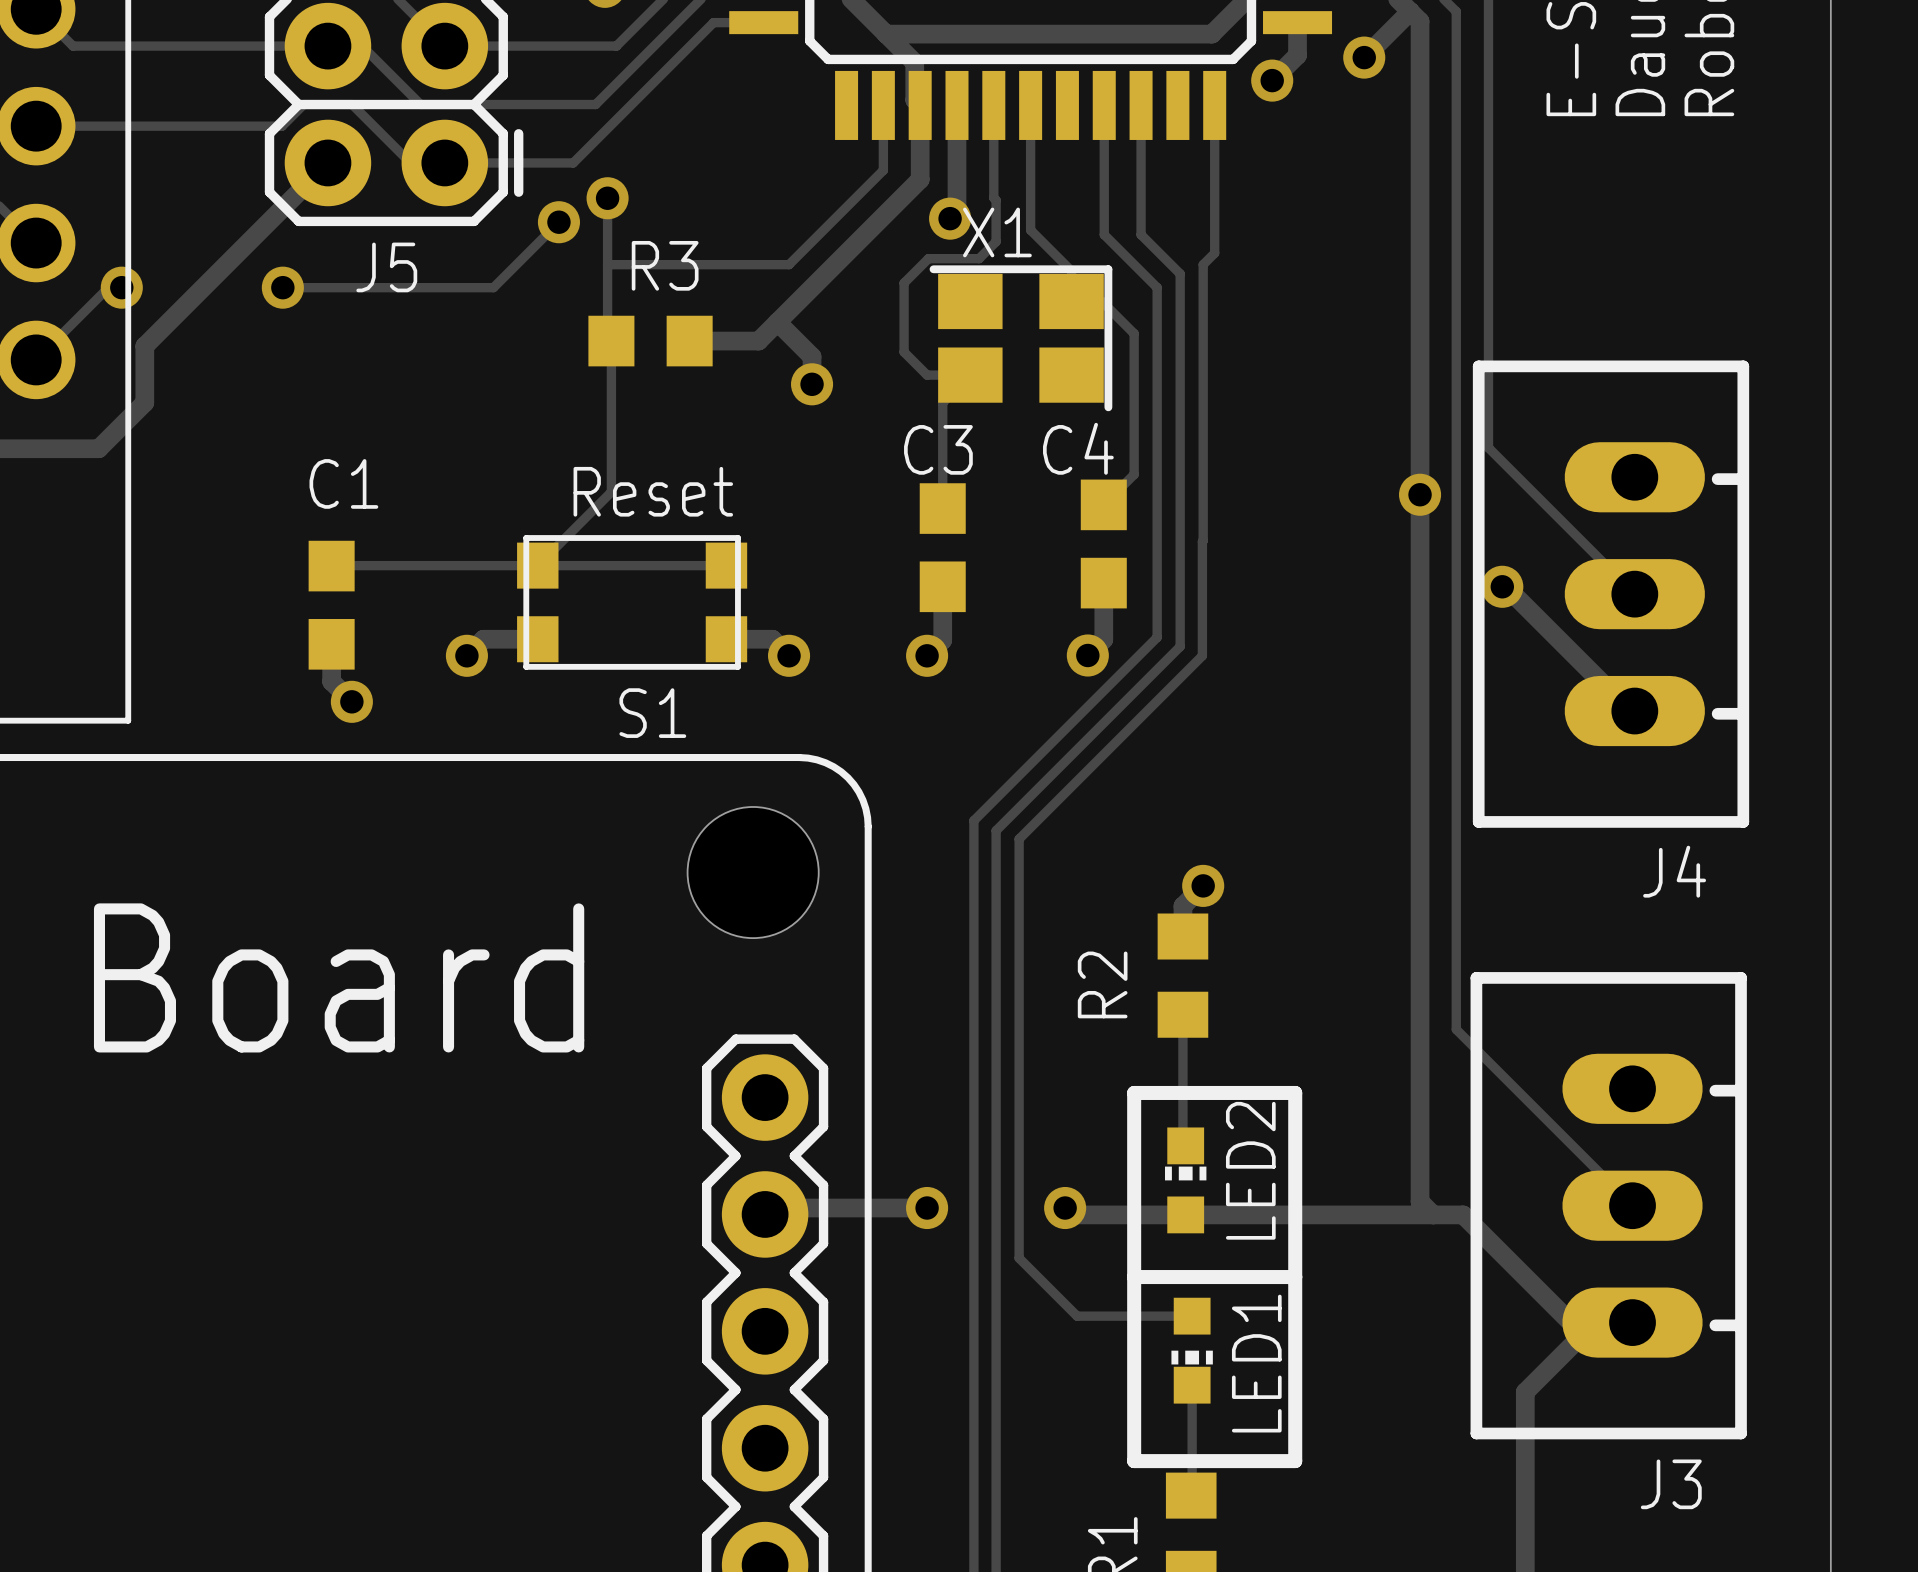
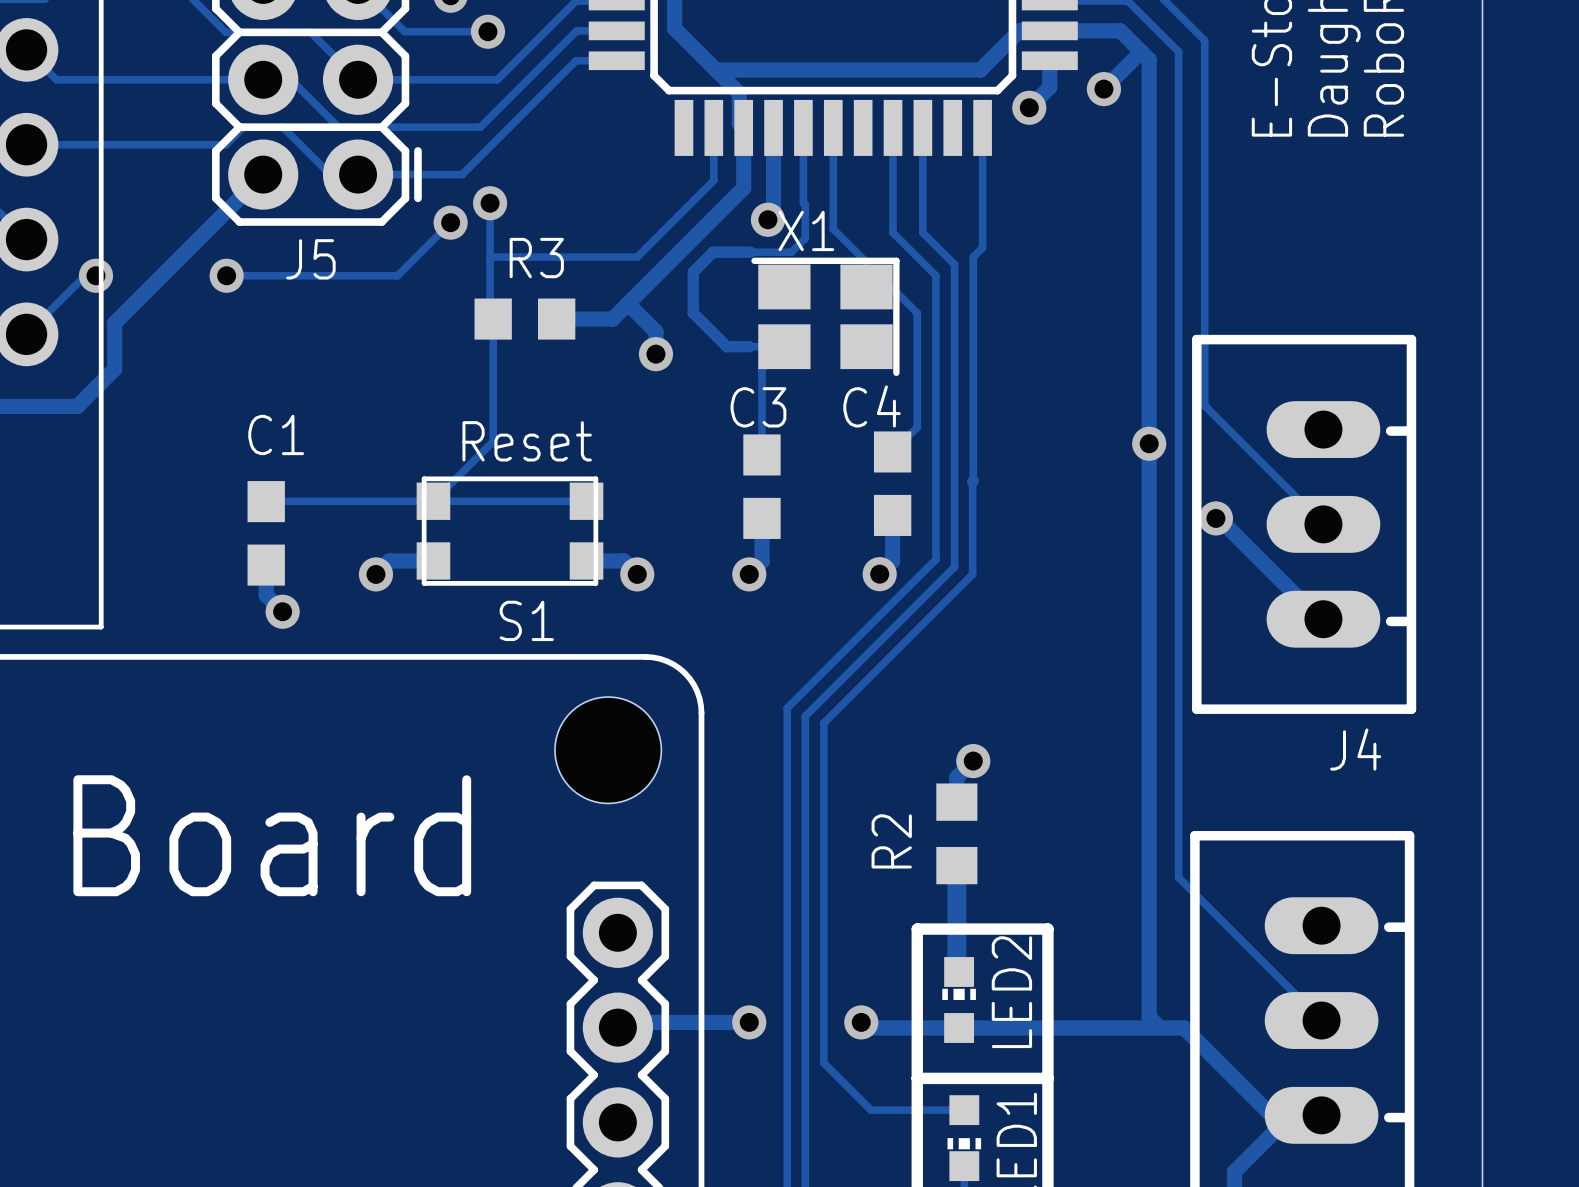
track: (928, 258) (904, 283) (904, 352) (927, 375) -> (750, 252) (713, 252) (693, 272) (693, 313) (726, 346) (749, 346)
track width: thin (1182, 1014) (1182, 1143) (1185, 1145) -> thick (956, 865) (956, 969) (959, 972)

